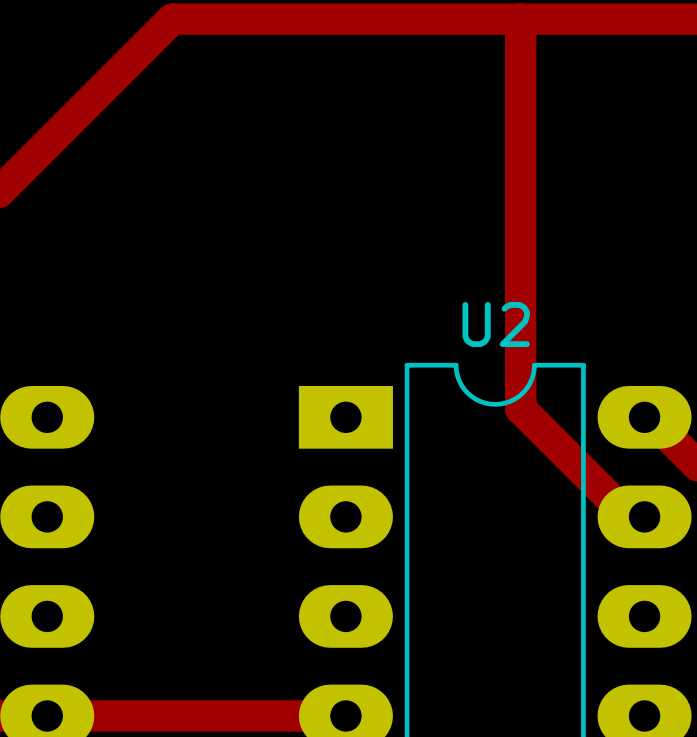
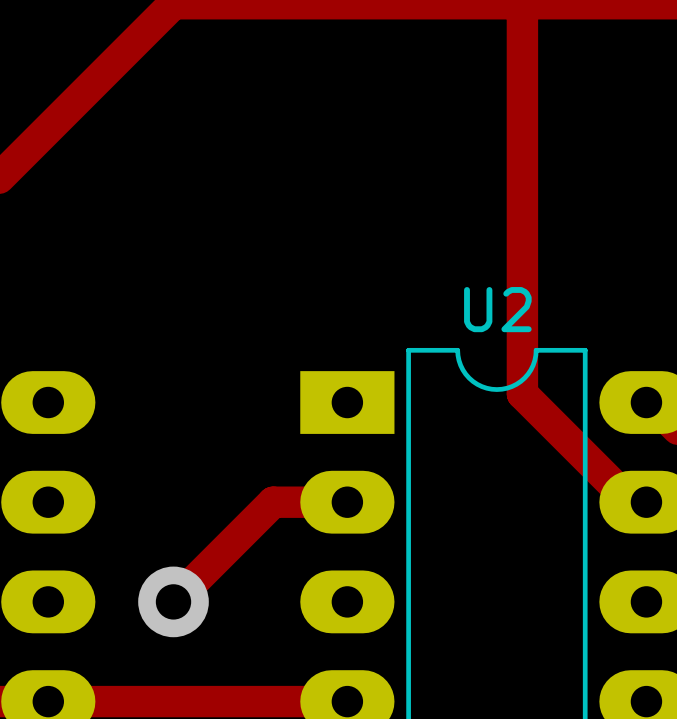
track: none -> (347, 502) (273, 502) (173, 601)
via: none -> (173, 601)

